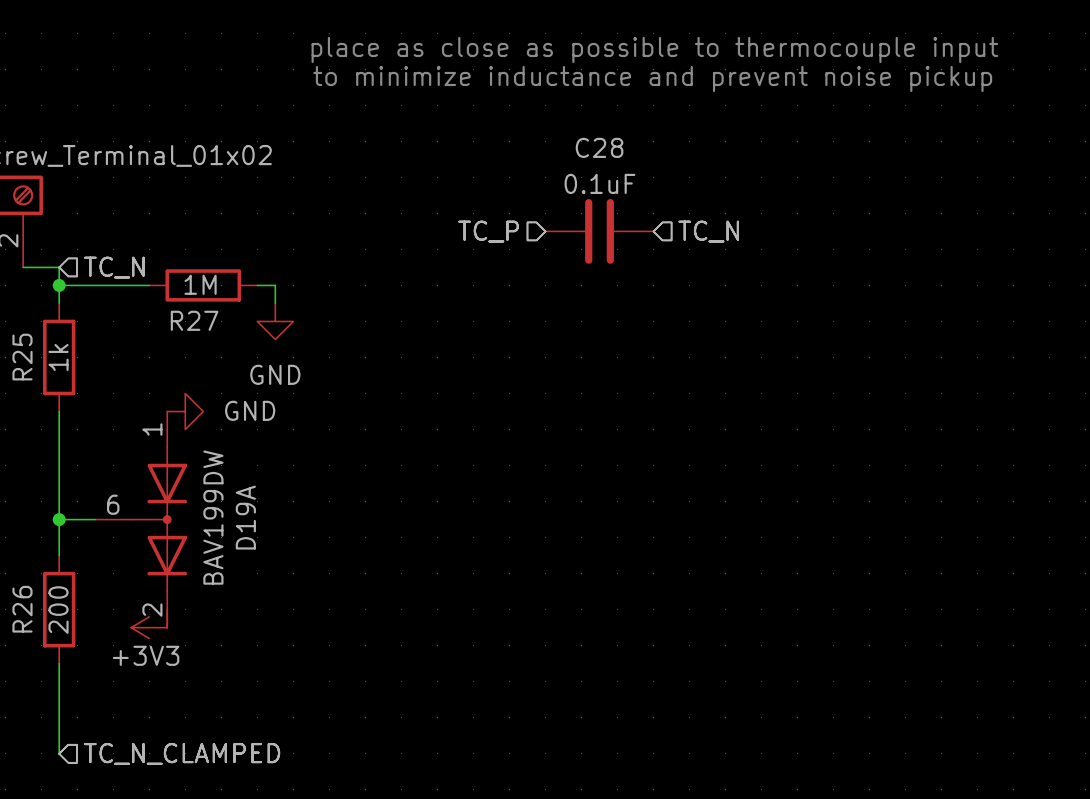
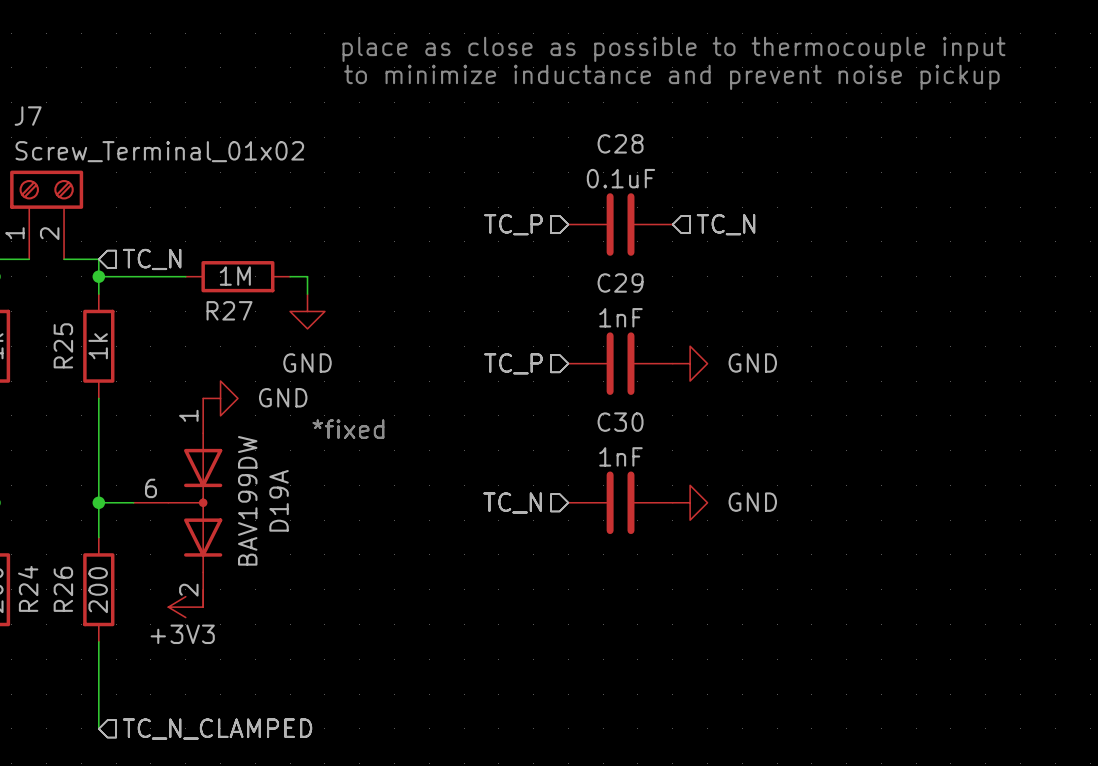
hierarchical label: none -> TC_P (513, 363)
C29: none -> 1nF (620, 363)
power symbol: none -> GND (690, 363)
text: none -> *fixed (348, 429)
hierarchical label: none -> TC_N (512, 502)
C30: none -> 1nF (620, 502)
power symbol: none -> GND (690, 502)

